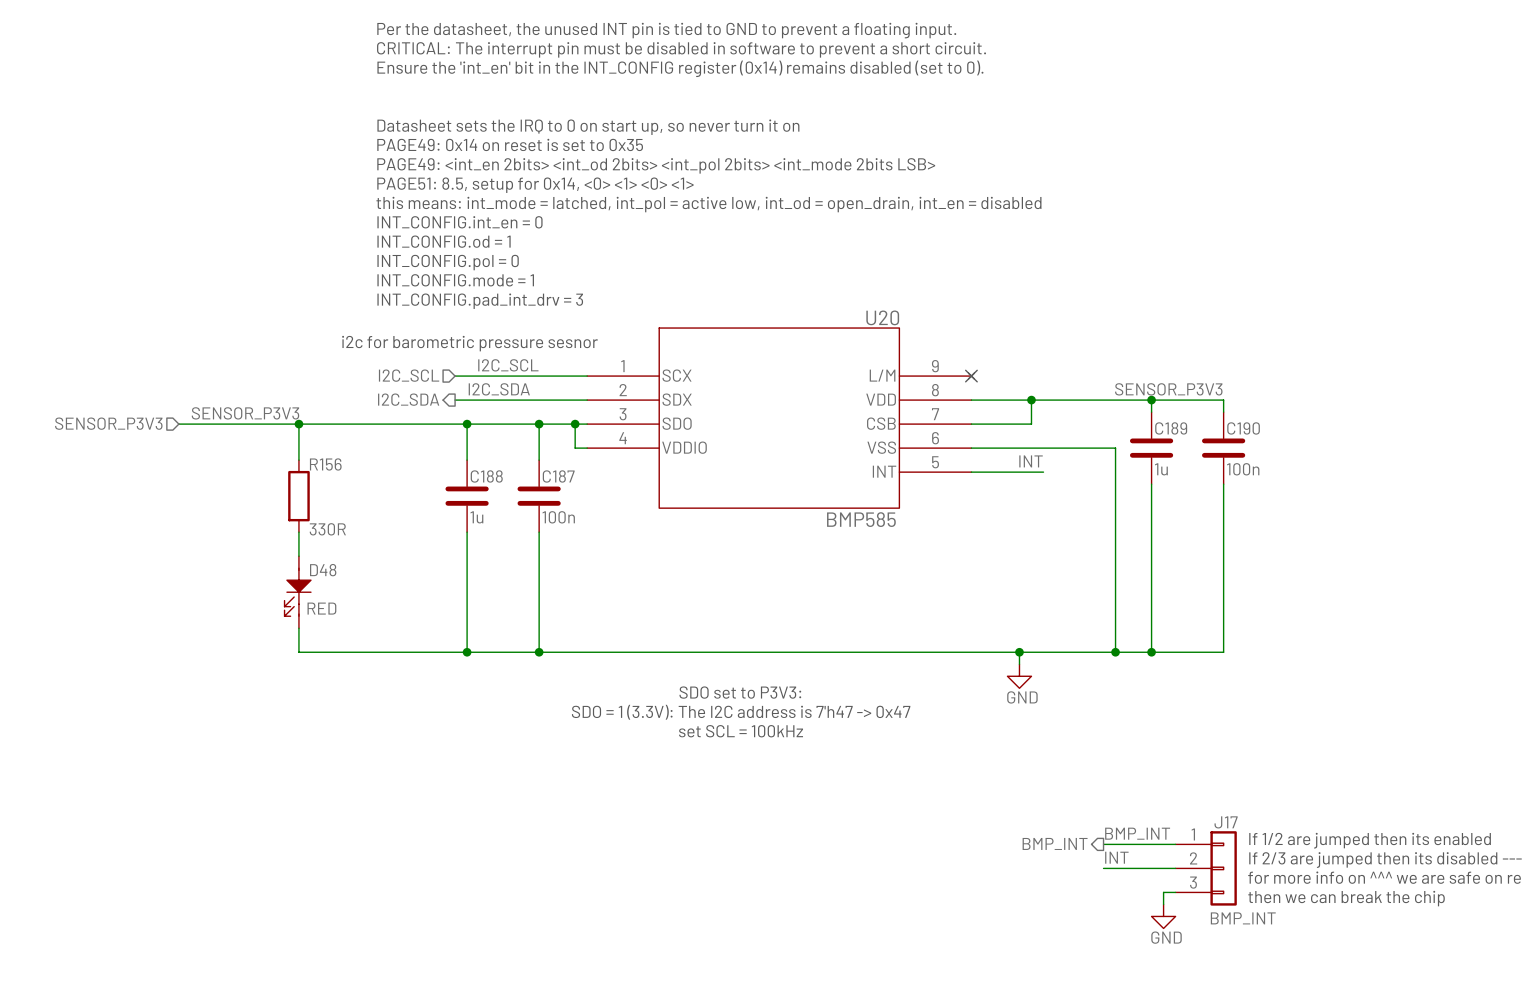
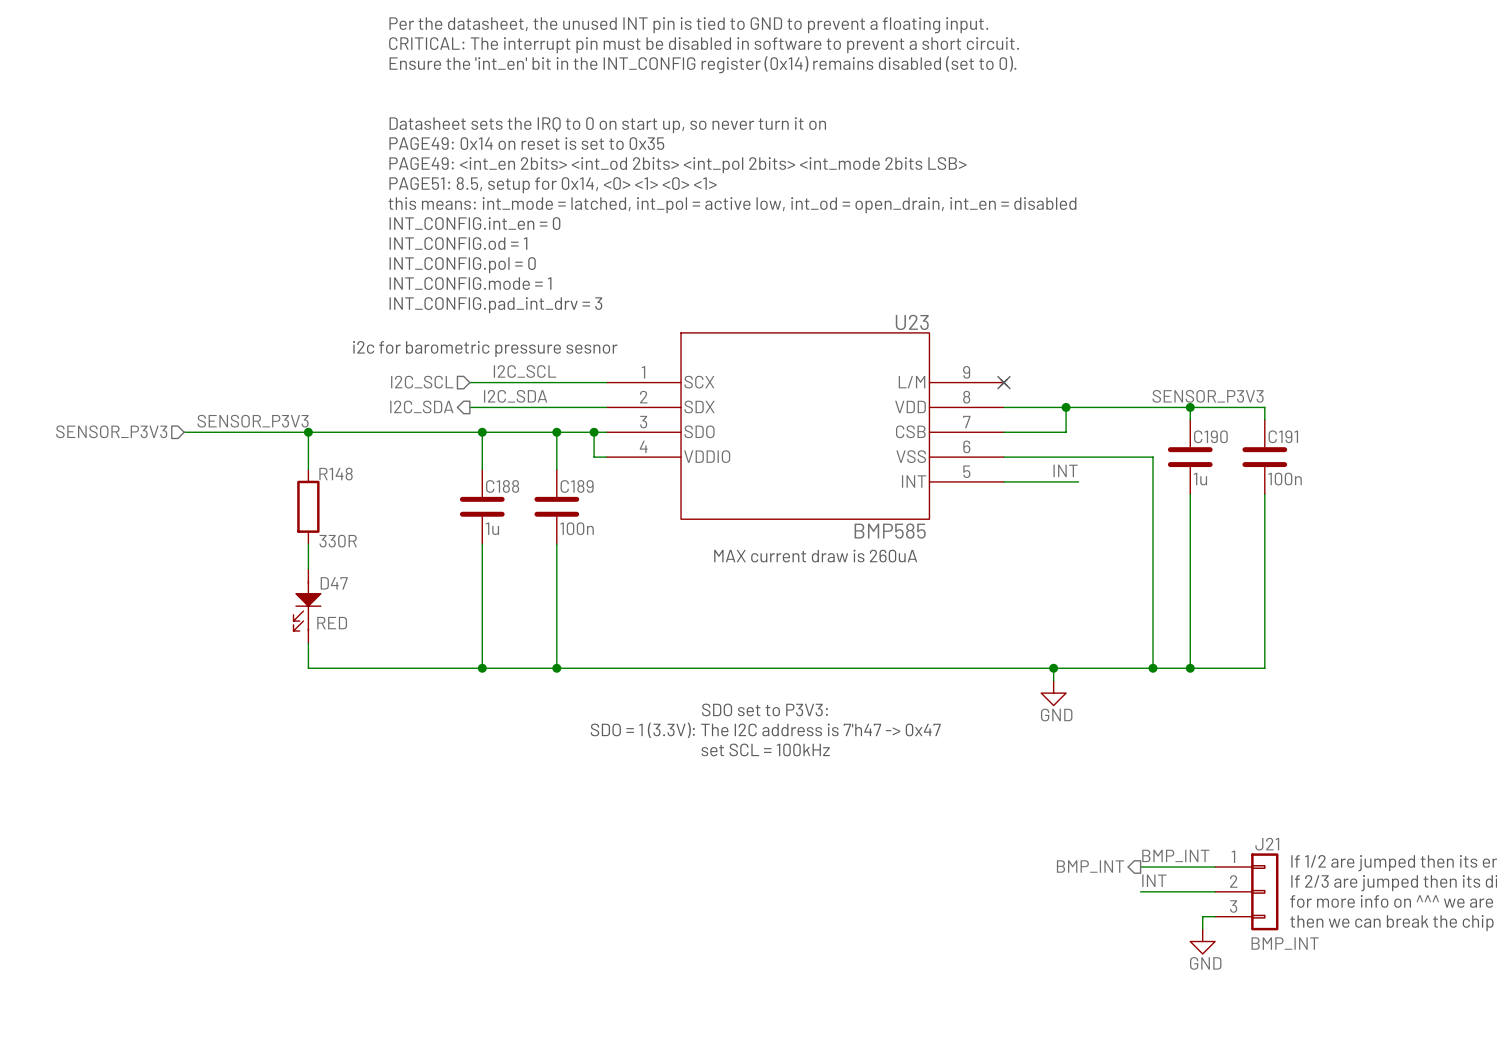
U20 name: U20 (882, 317) -> U23 (912, 322)
C189 name: C189 (1171, 428) -> C190 (1210, 436)
C190 name: C190 (1243, 428) -> C191 (1283, 436)
R156 name: R156 (325, 464) -> R148 (336, 474)
C187 name: C187 (558, 476) -> C189 (577, 486)
text: none -> MAX current draw is 260uA (815, 556)
D48 name: D48 (323, 570) -> D47 (334, 583)
J17 name: J17 (1226, 822) -> J21 (1267, 844)

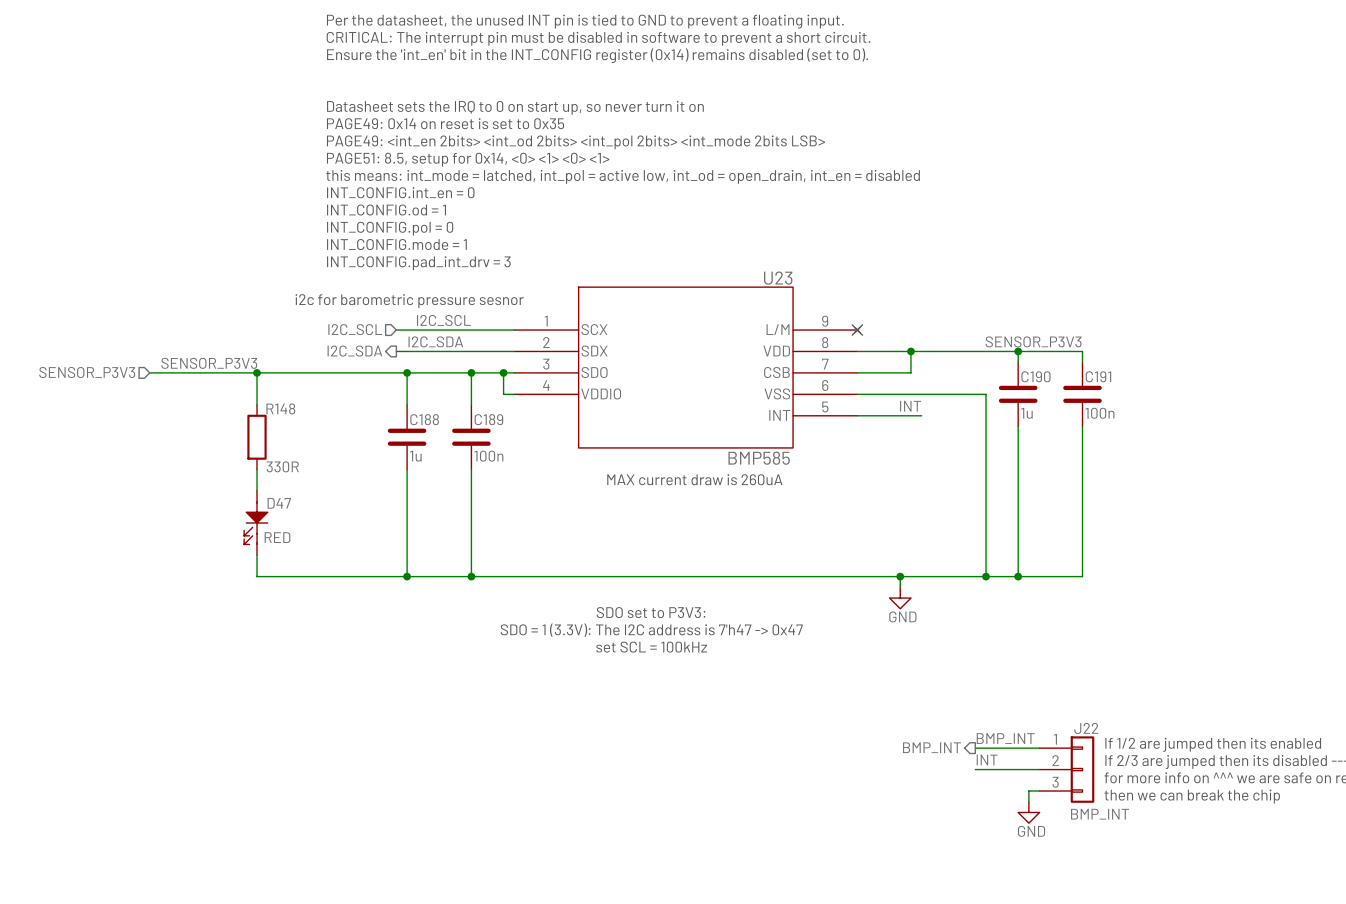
J21 name: J21 (1267, 844) -> J22 (1086, 728)

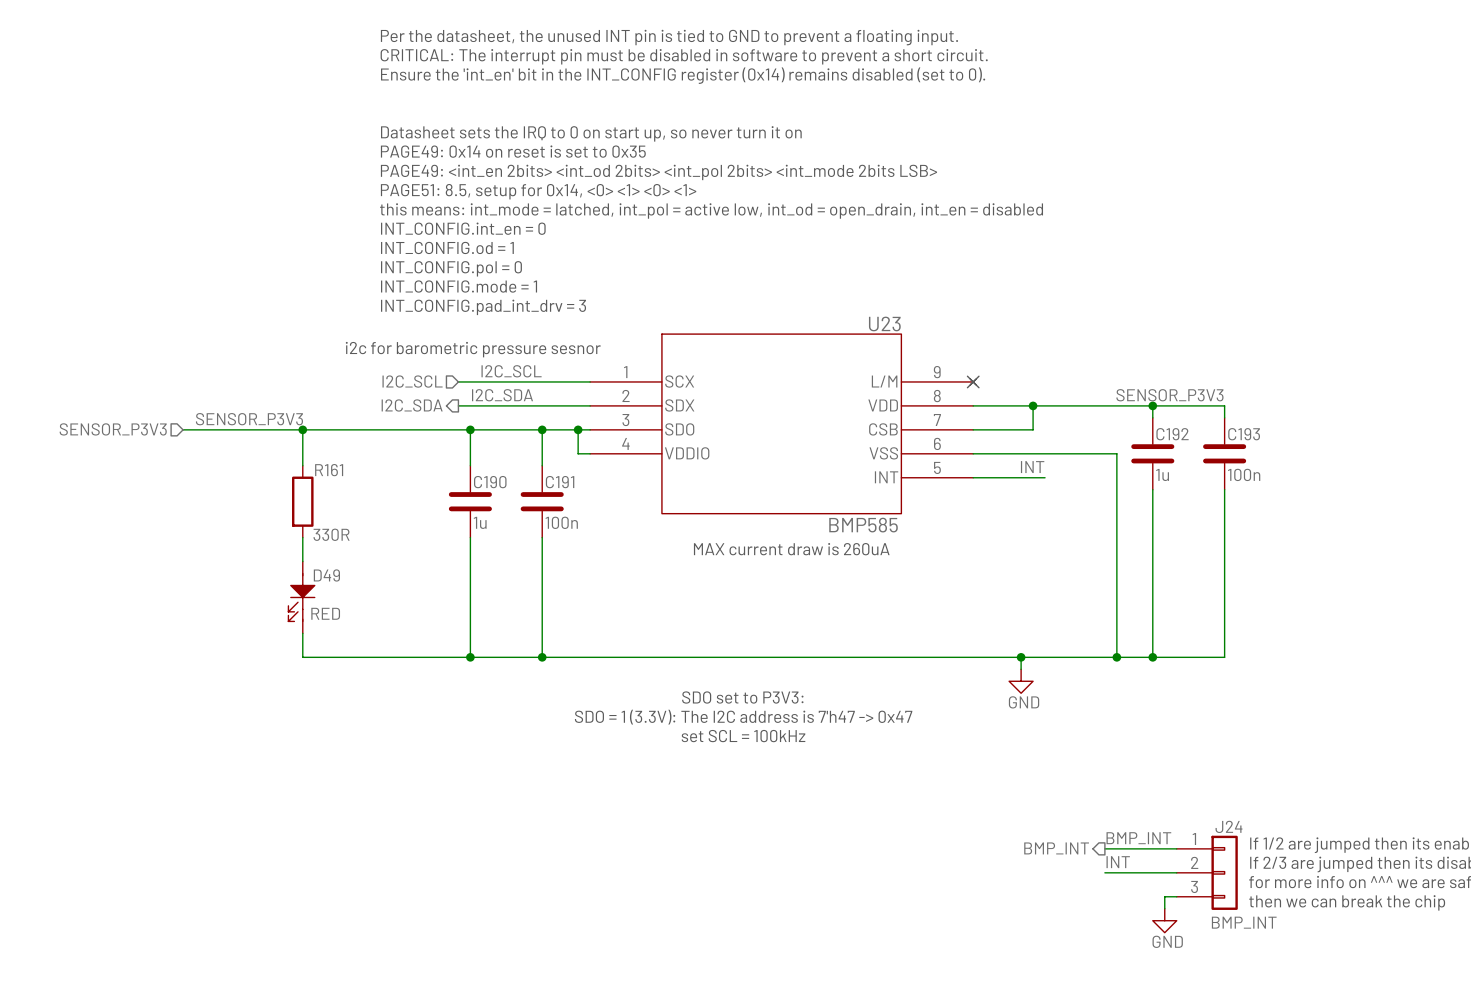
C190 name: C190 (1035, 376) -> C192 (1172, 434)
C191 name: C191 (1098, 376) -> C193 (1244, 434)
R148 name: R148 (280, 408) -> R161 (329, 470)
C188 name: C188 (424, 419) -> C190 (490, 482)
C189 name: C189 (488, 419) -> C191 (560, 482)
D47 name: D47 (279, 503) -> D49 (326, 575)
J22 name: J22 (1086, 728) -> J24 (1229, 826)

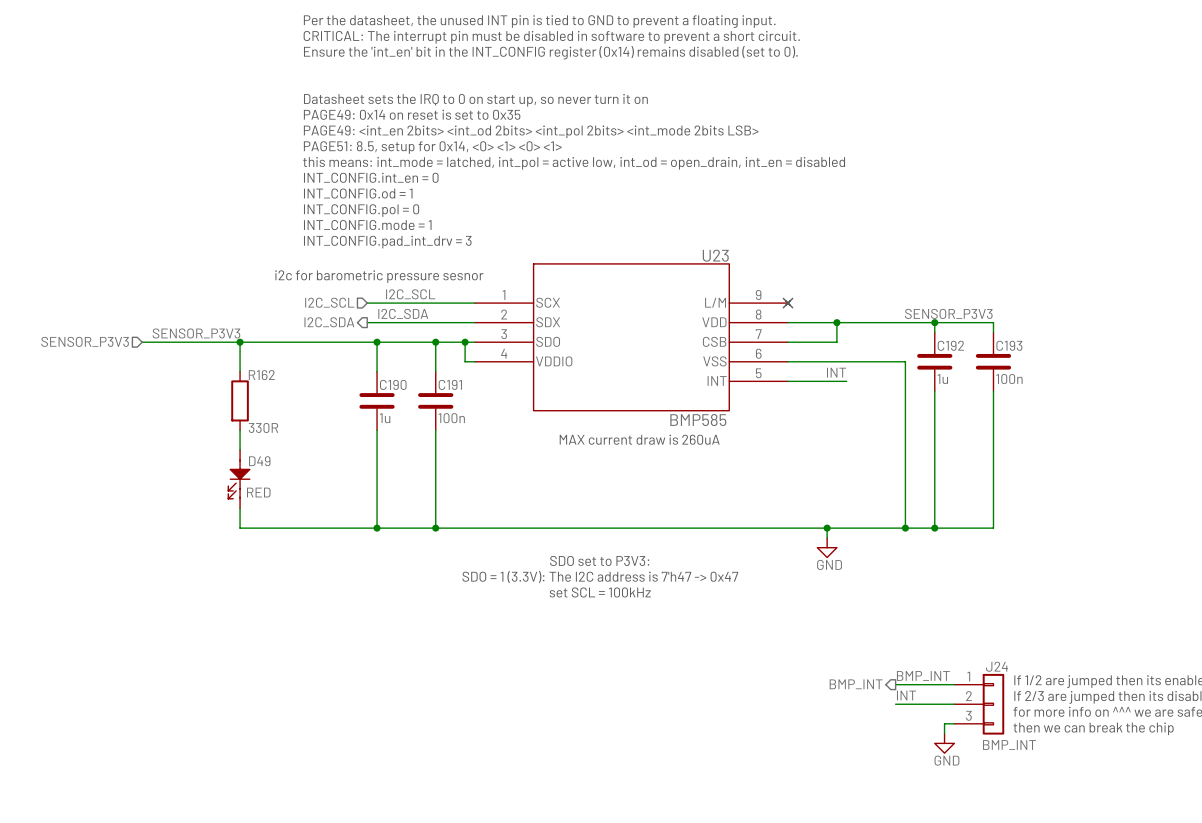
R161 name: R161 (329, 470) -> R162 (261, 375)

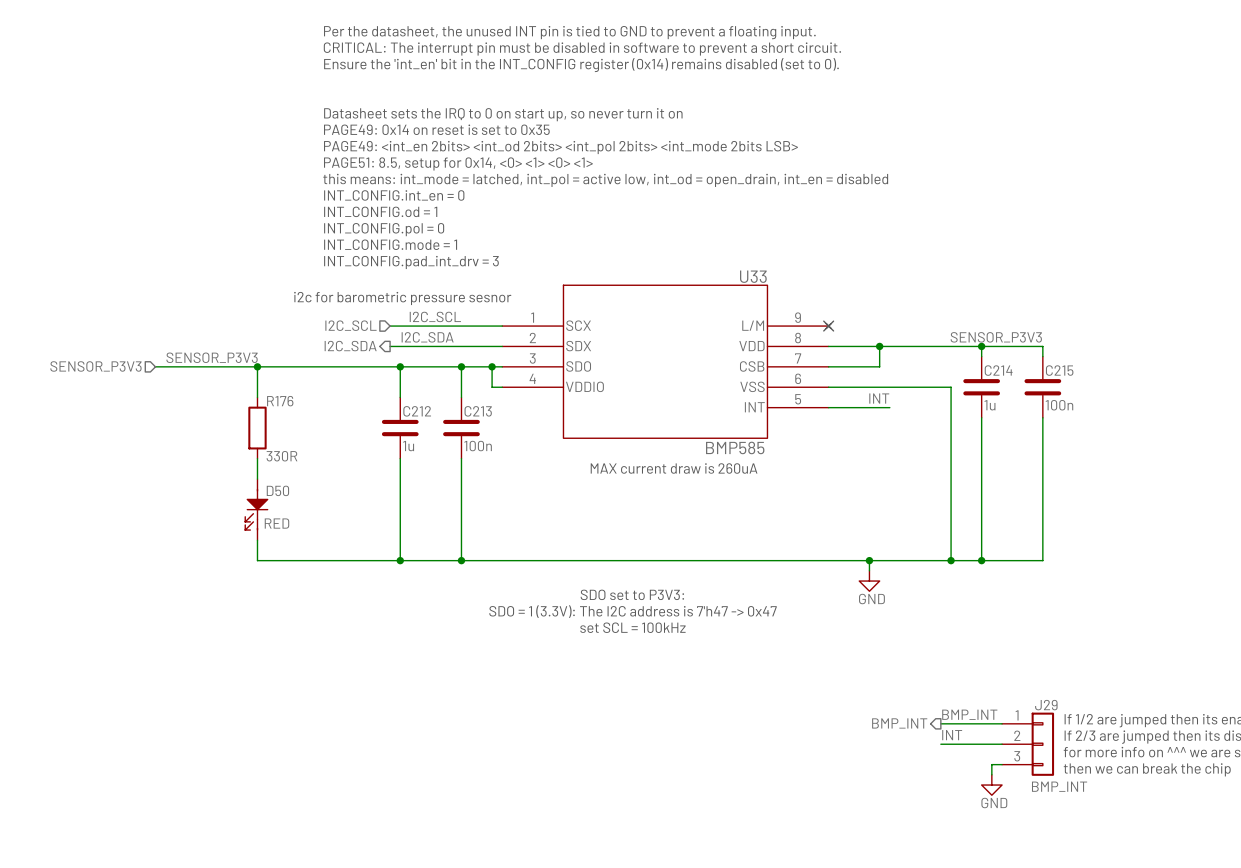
U23 name: U23 (715, 255) -> U33 (753, 276)
C192 name: C192 (950, 345) -> C214 (998, 370)
C193 name: C193 (1009, 345) -> C215 (1059, 370)
R162 name: R162 (261, 375) -> R176 (280, 401)
C190 name: C190 (393, 384) -> C212 (417, 411)
C191 name: C191 (450, 384) -> C213 (478, 411)
D49 name: D49 (259, 461) -> D50 (277, 490)
J24 name: J24 (997, 666) -> J29 (1046, 705)

